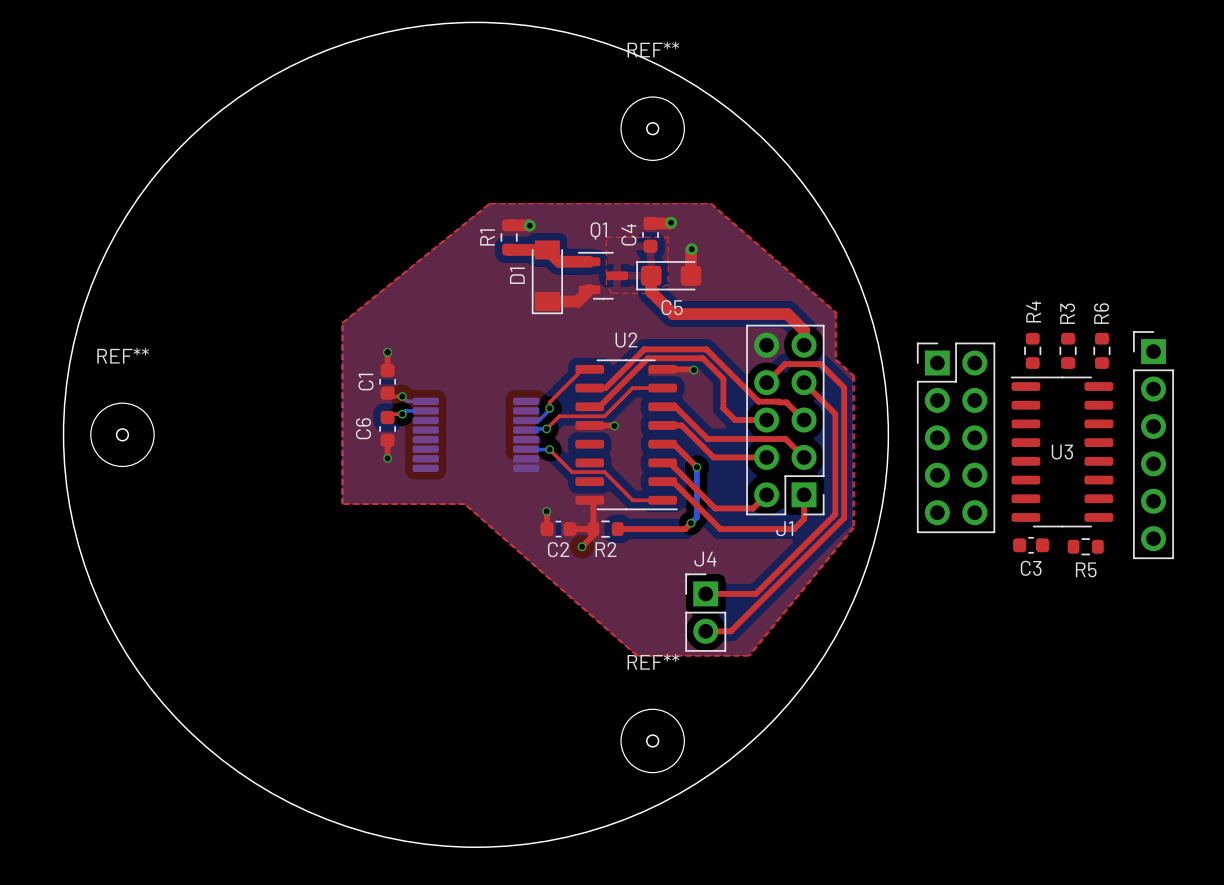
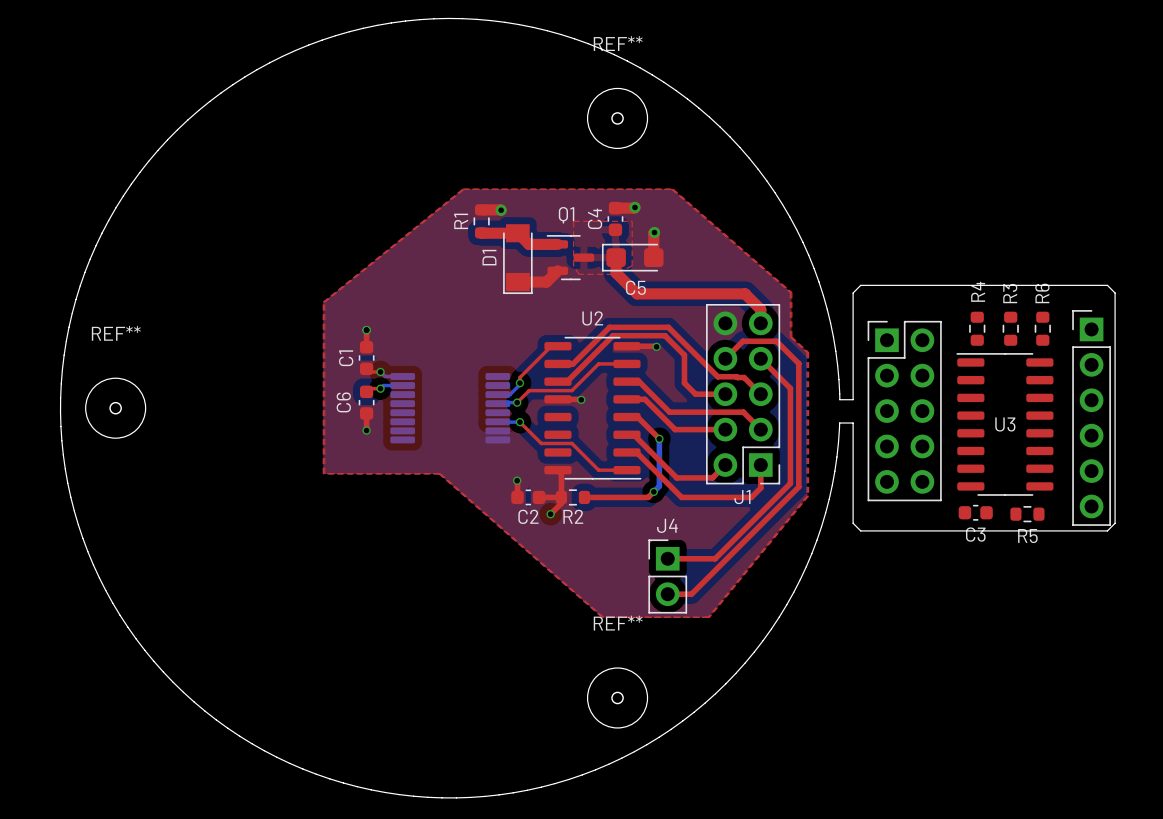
round board edge: [62, 21, 890, 848] -> none
board edge: none -> (448, 18) (391, 22) (335, 35) (282, 56) (257, 69) (221, 92) (198, 110) (167, 139) (131, 184) (102, 233) (80, 285) (69, 327) (64, 355) (60, 412) (65, 469) (78, 524) (99, 577) (127, 627) (153, 661) (173, 682) (216, 719) (264, 750) (316, 774) (357, 786) (413, 796) (470, 797) (527, 790) (568, 779) (621, 758) (671, 729) (715, 693) (745, 662) (779, 617) (806, 566) (821, 526) (834, 471) (839, 423) (853, 423) (853, 523) (860, 530) (1107, 530) (1115, 523) (1115, 292) (1107, 285) (860, 285) (853, 292) (853, 399) (839, 399) (837, 365) (830, 323) (823, 295) (808, 255) (796, 229) (774, 192) (749, 158) (720, 126) (687, 99) (652, 74) (614, 54) (588, 43) (560, 34) (519, 24) (490, 20) (448, 18)

